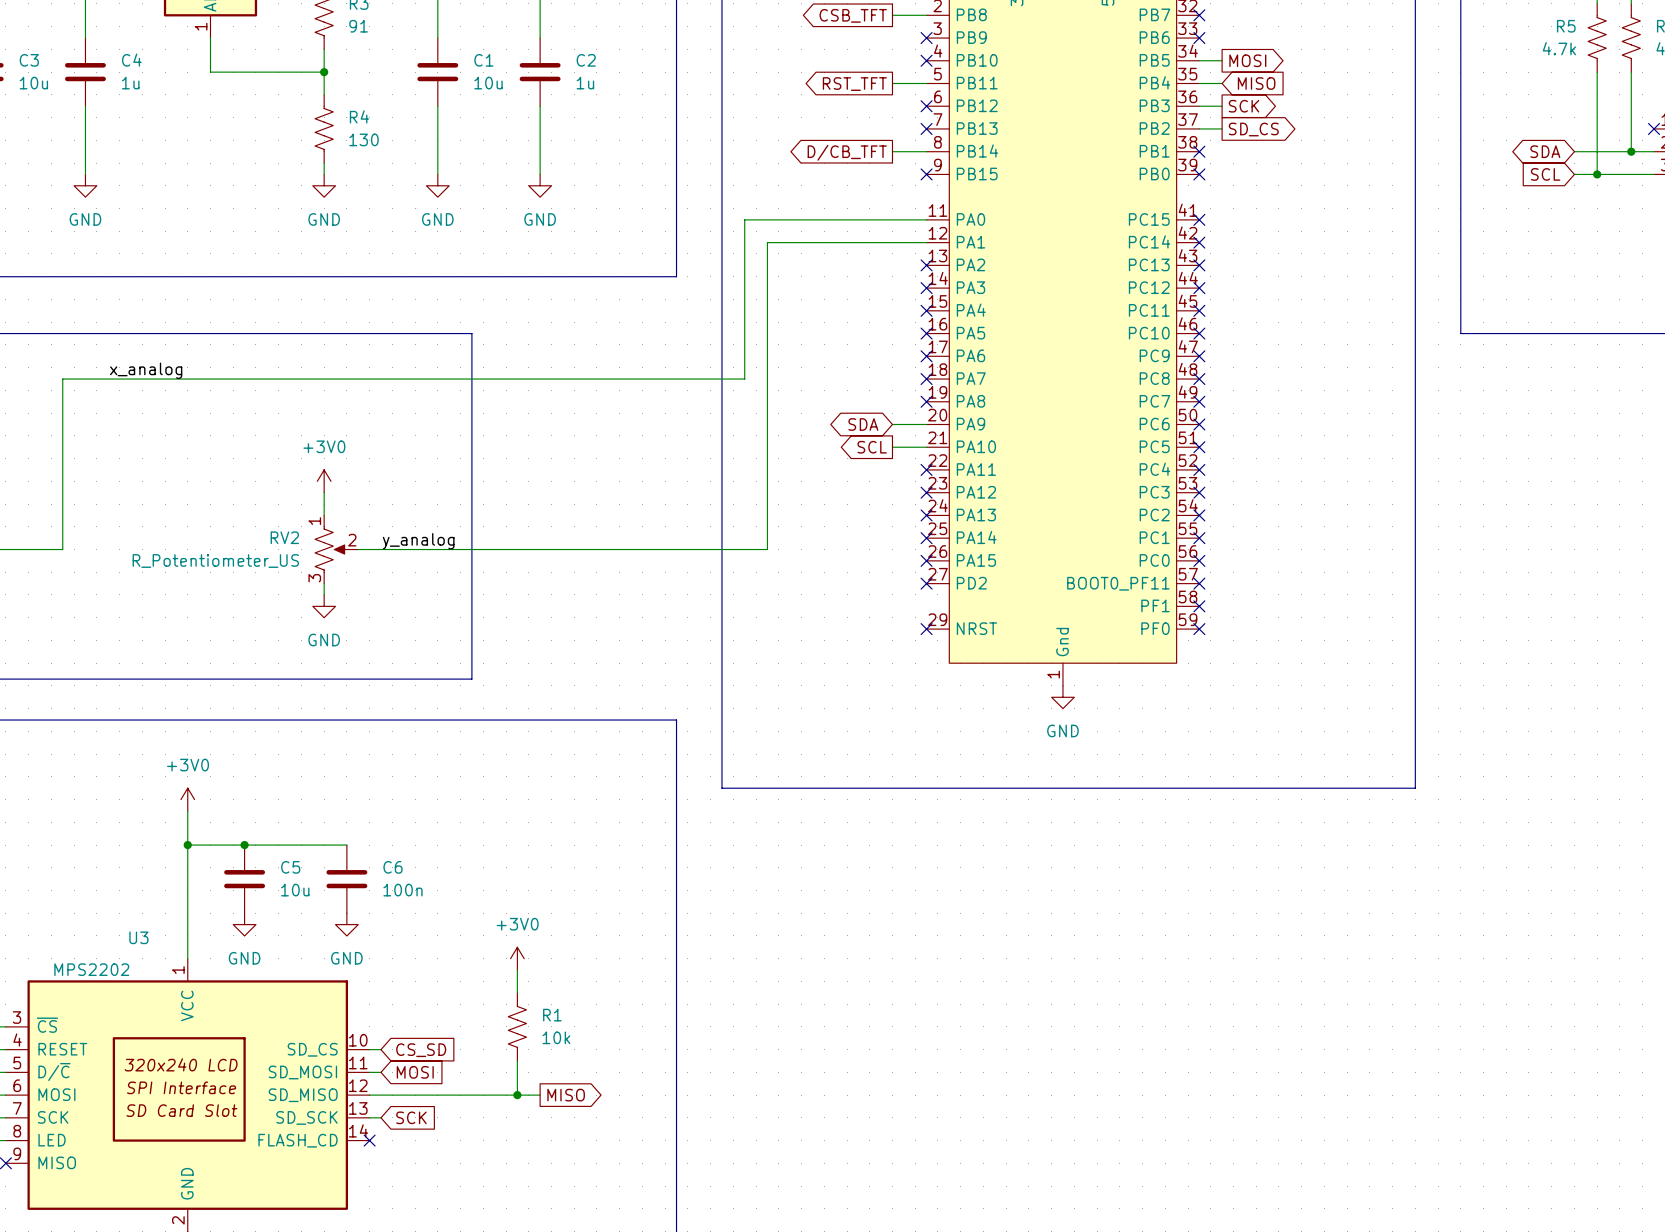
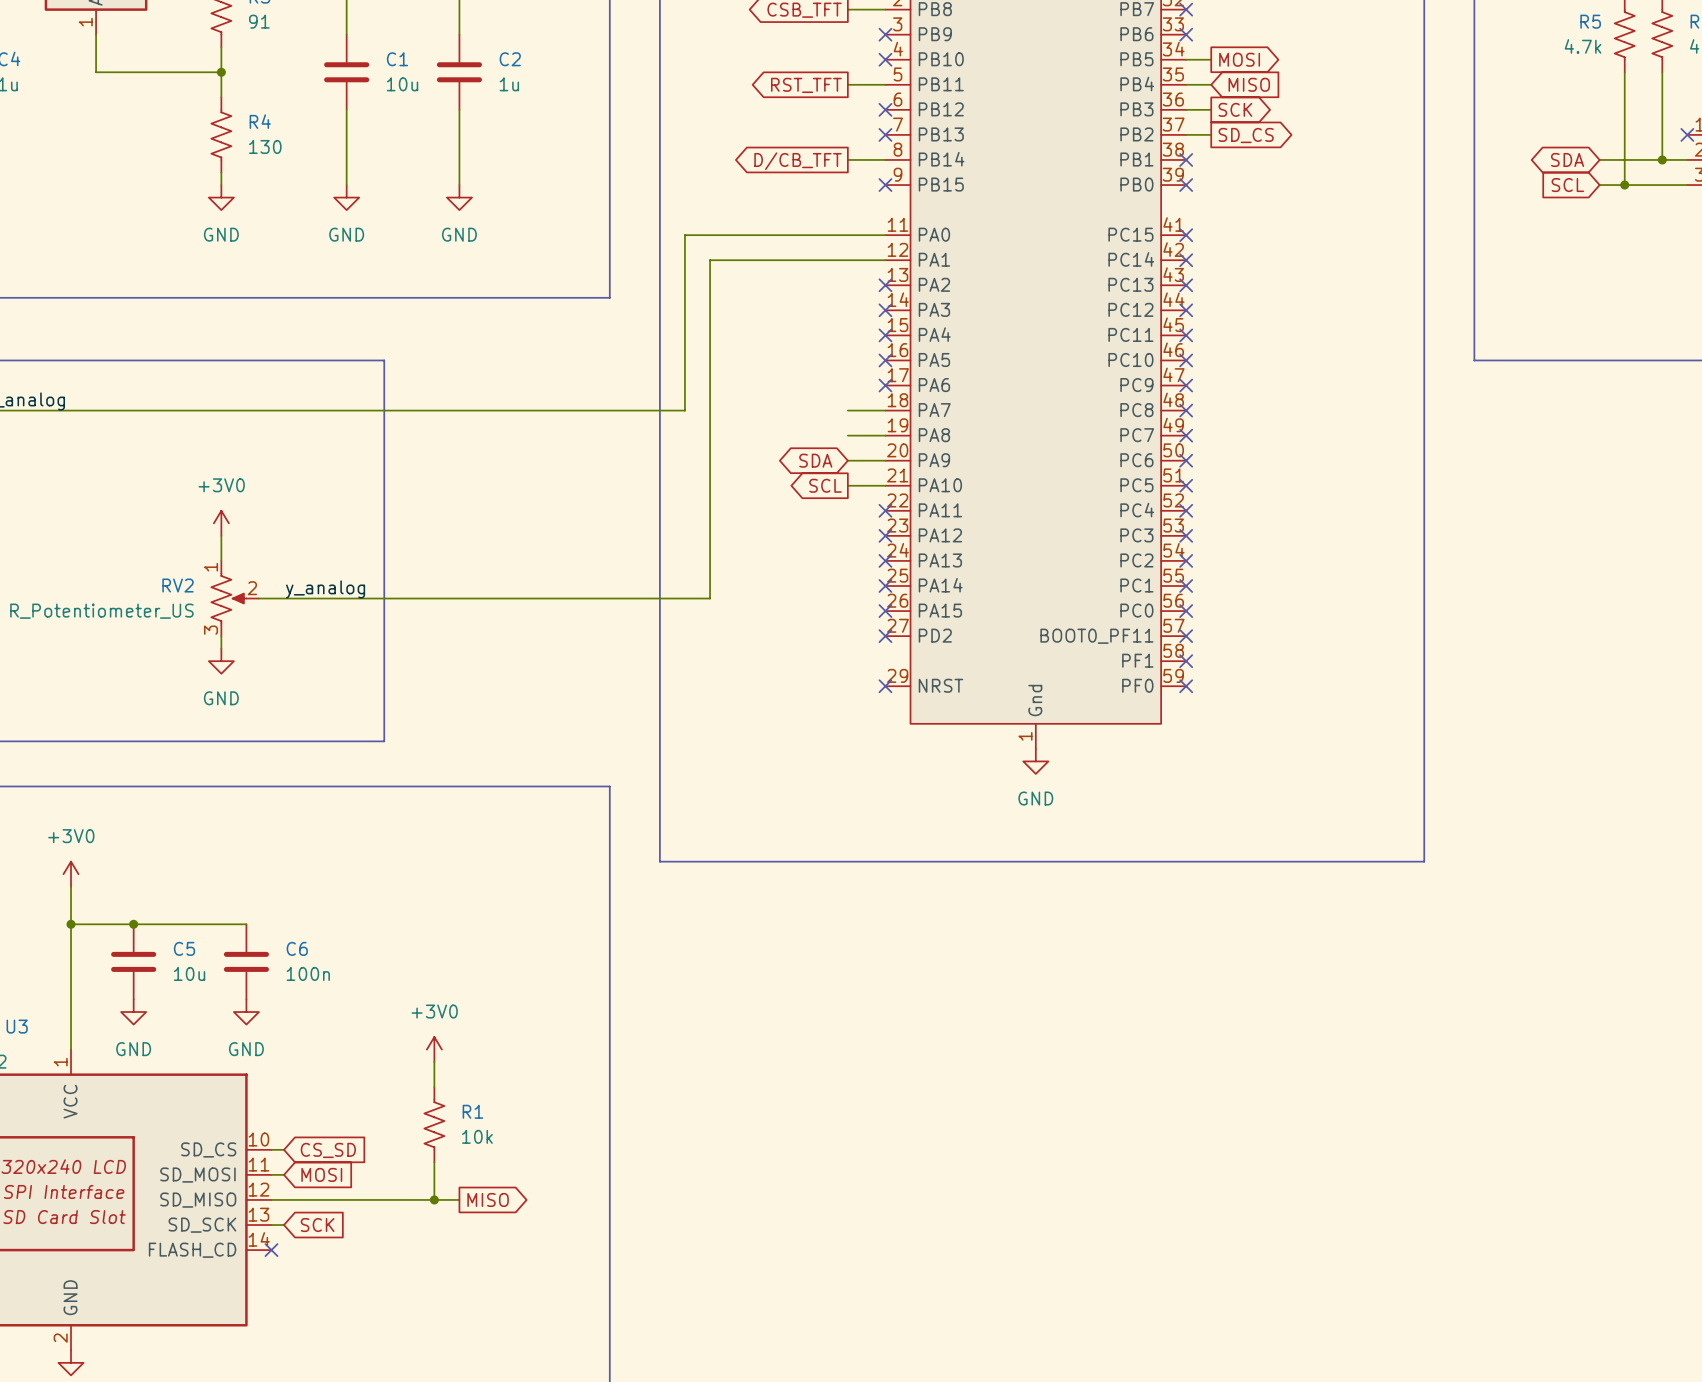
wire: none -> (847, 410) (885, 410)
no-connect mark: (926, 379) -> none
wire: none -> (847, 435) (885, 435)
no-connect mark: (926, 401) -> none

